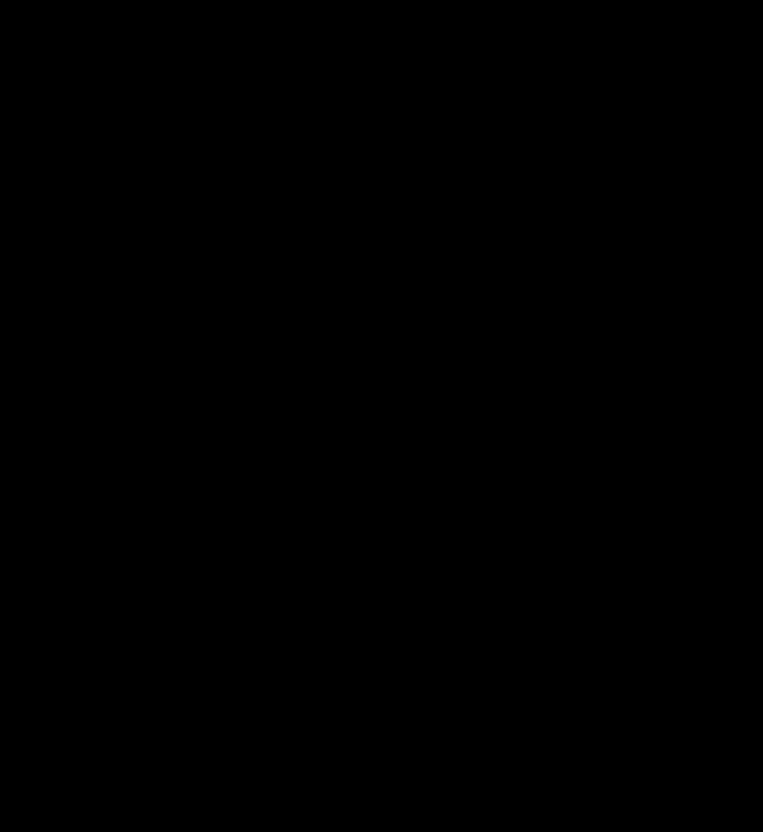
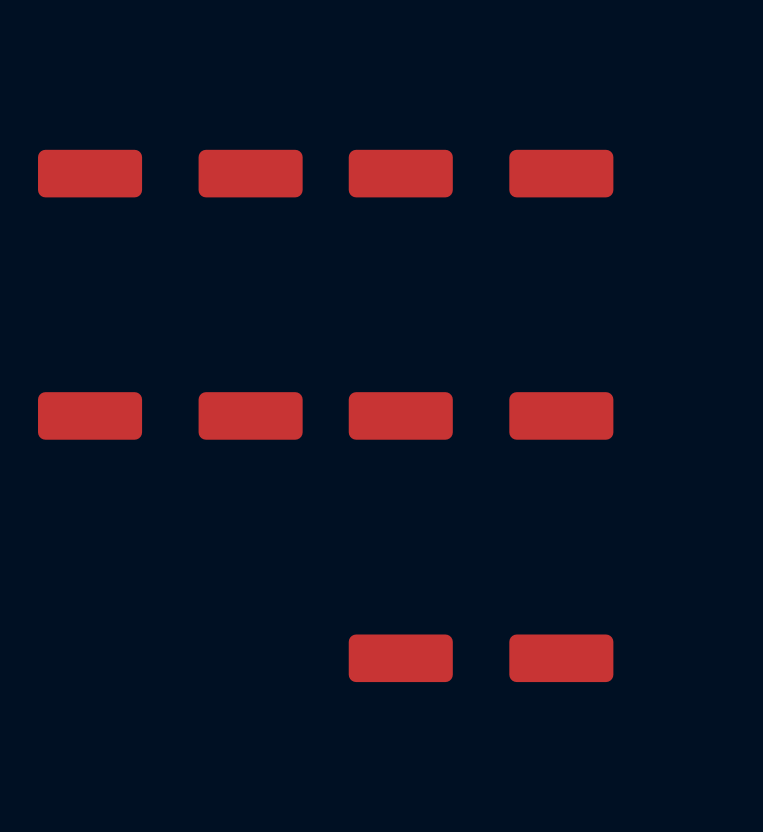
part: none -> (170, 173)
part: none -> (481, 173)
part: none -> (170, 415)
part: none -> (481, 415)
part: none -> (481, 658)

